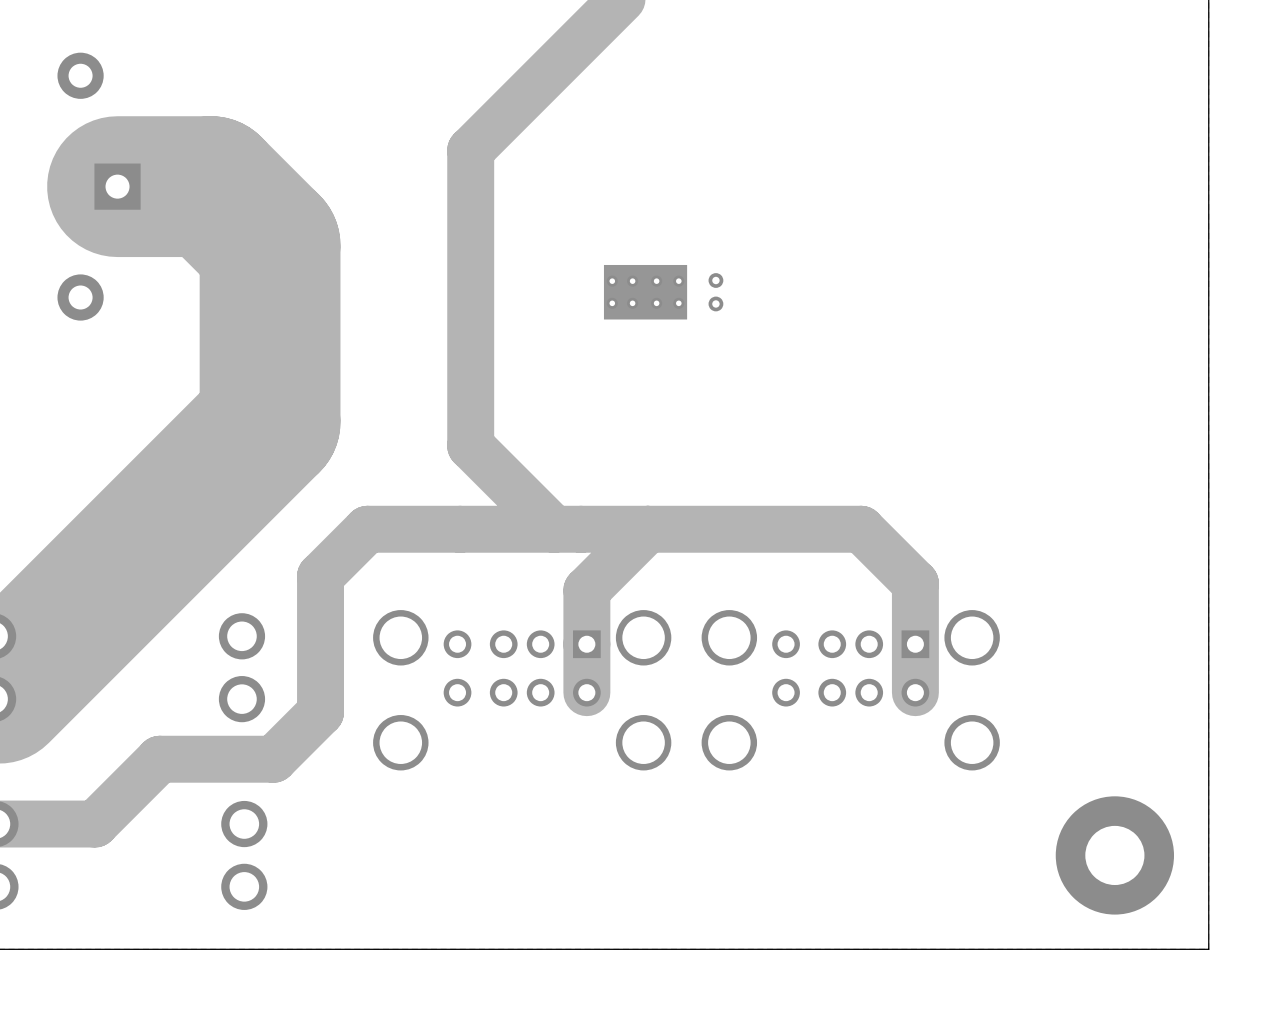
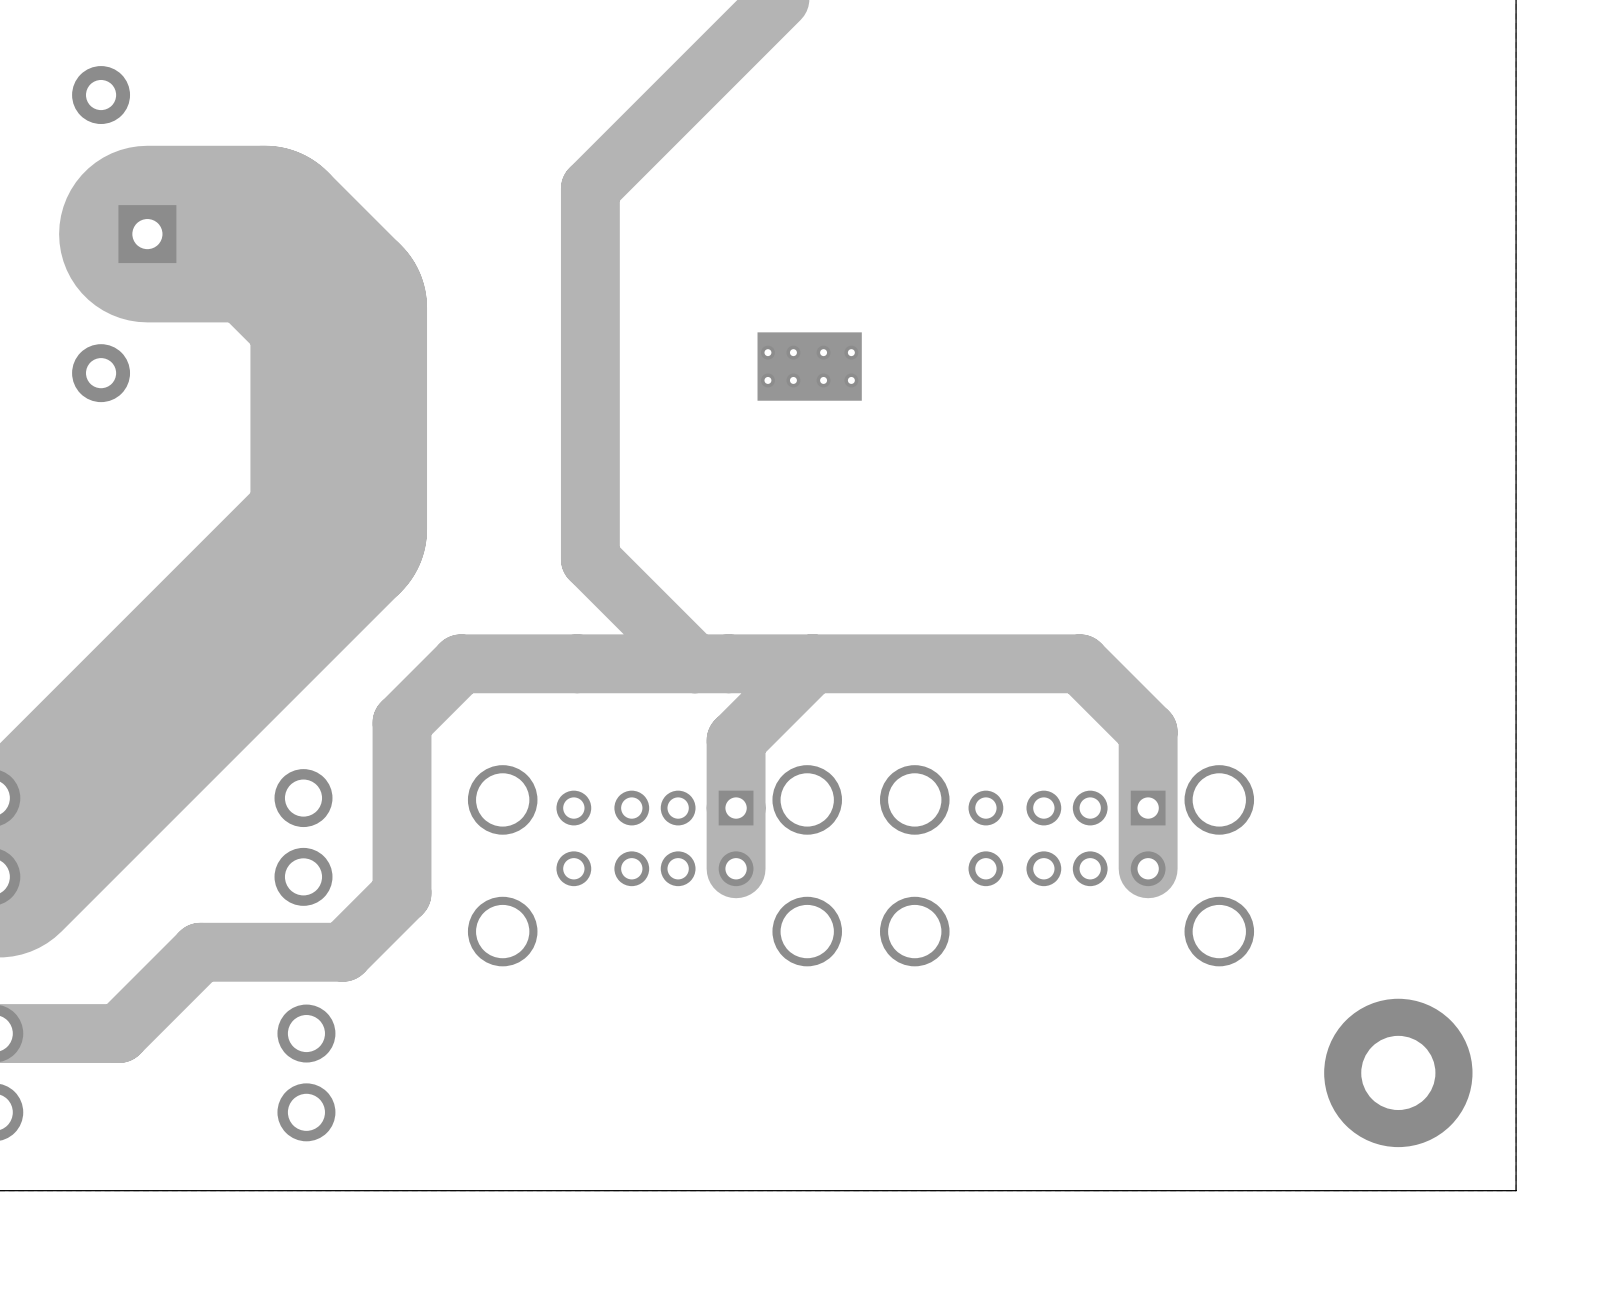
via: (715, 280) -> none
via: (715, 303) -> none

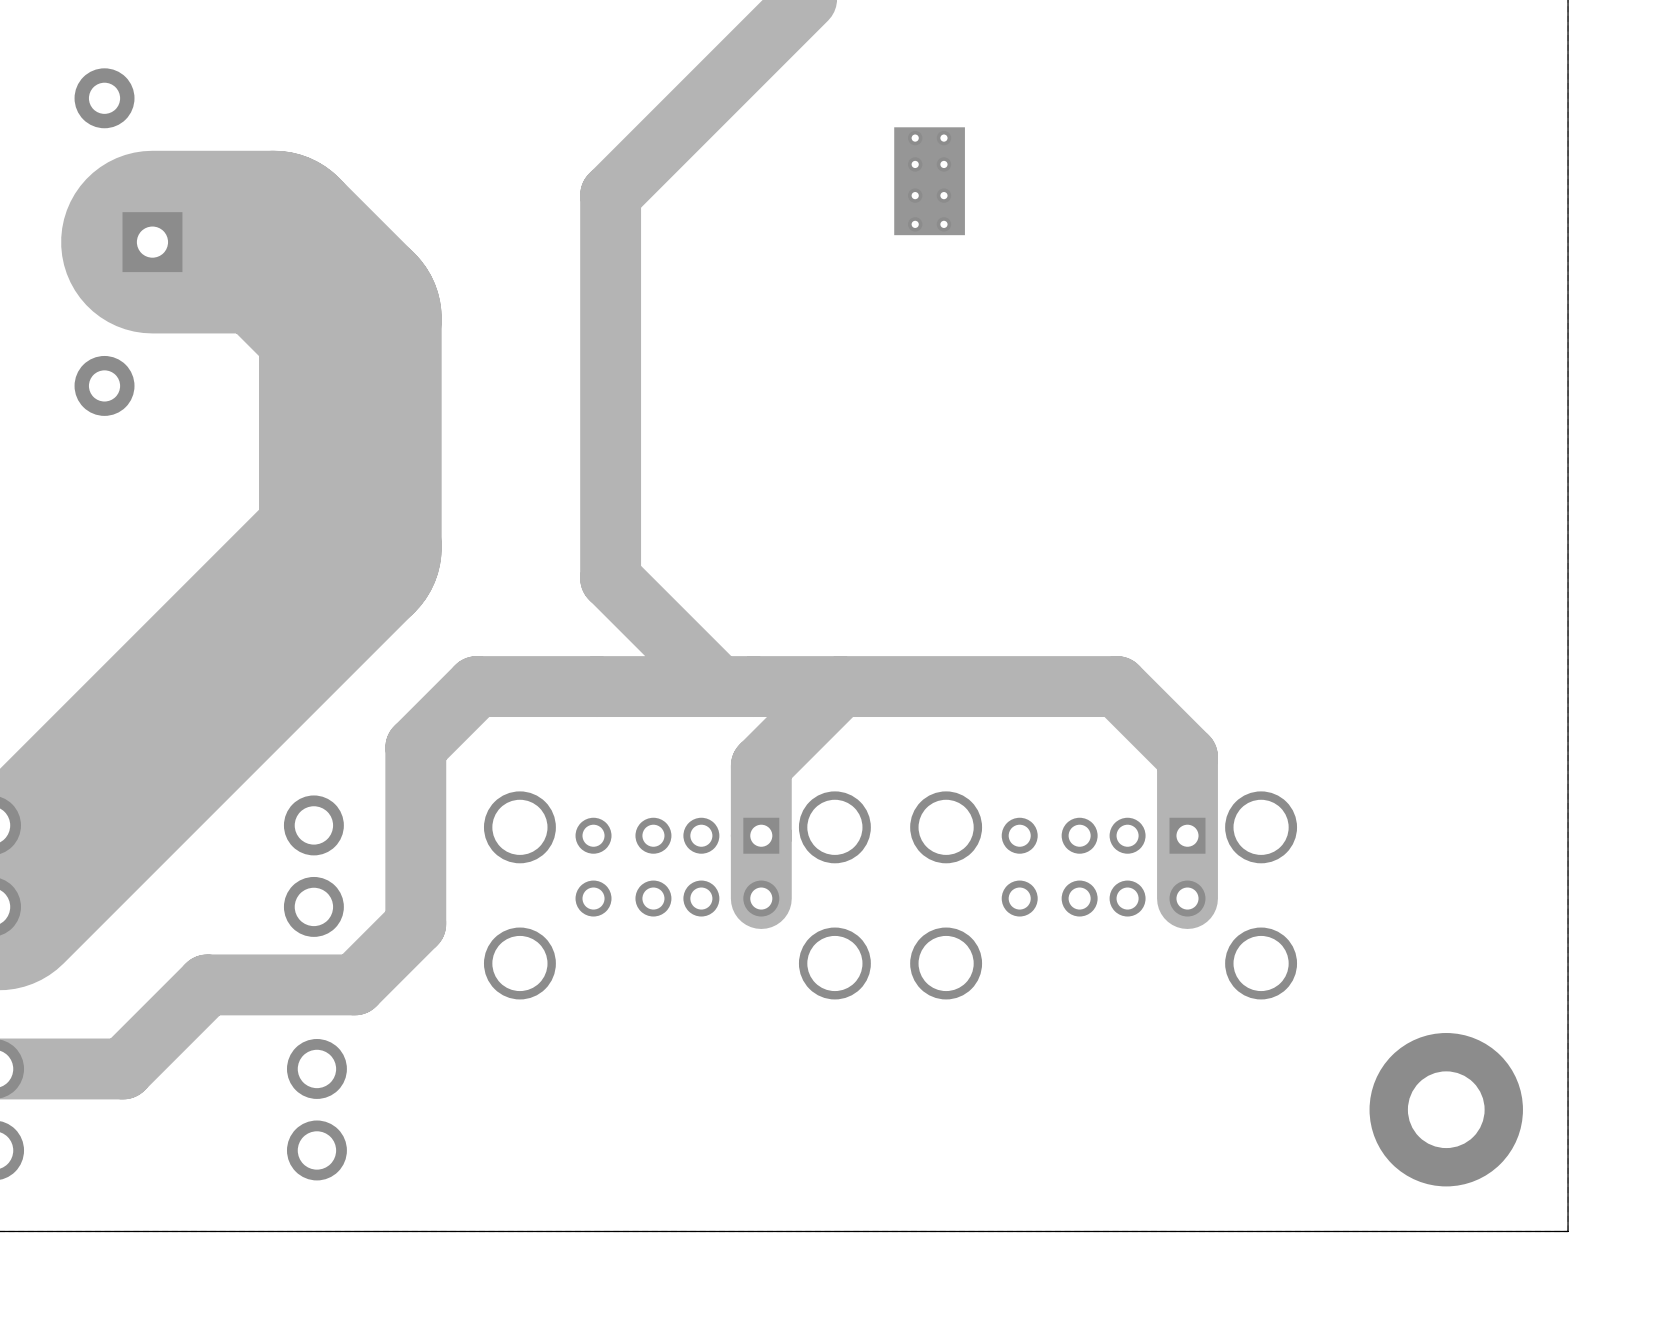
part rotation: 0° (809, 366) -> 90° clockwise (929, 181)
part position: (809, 366) -> (929, 181)

